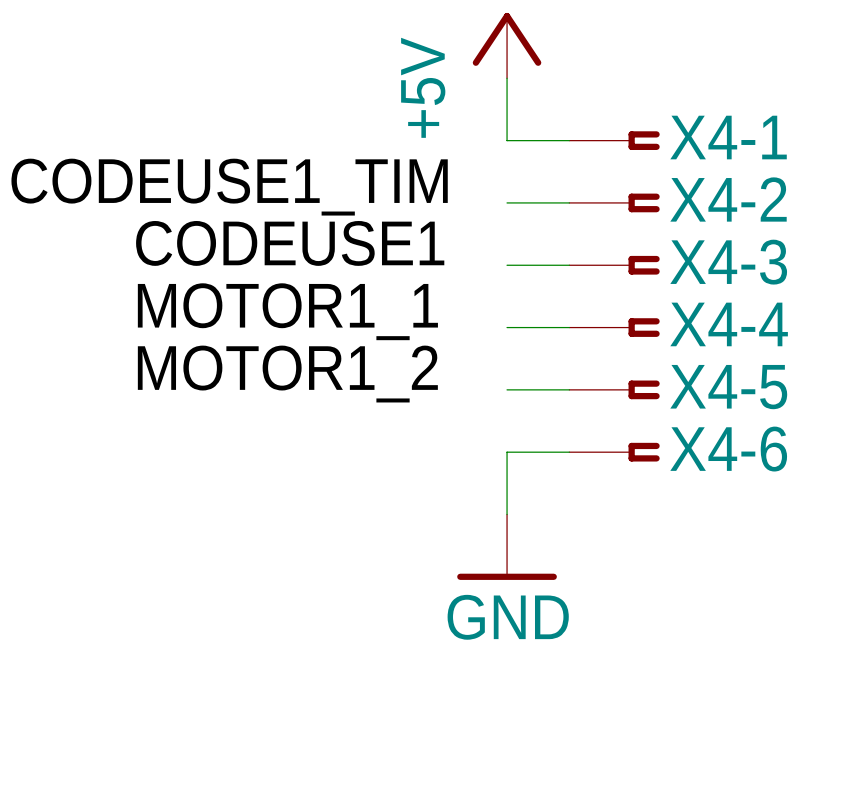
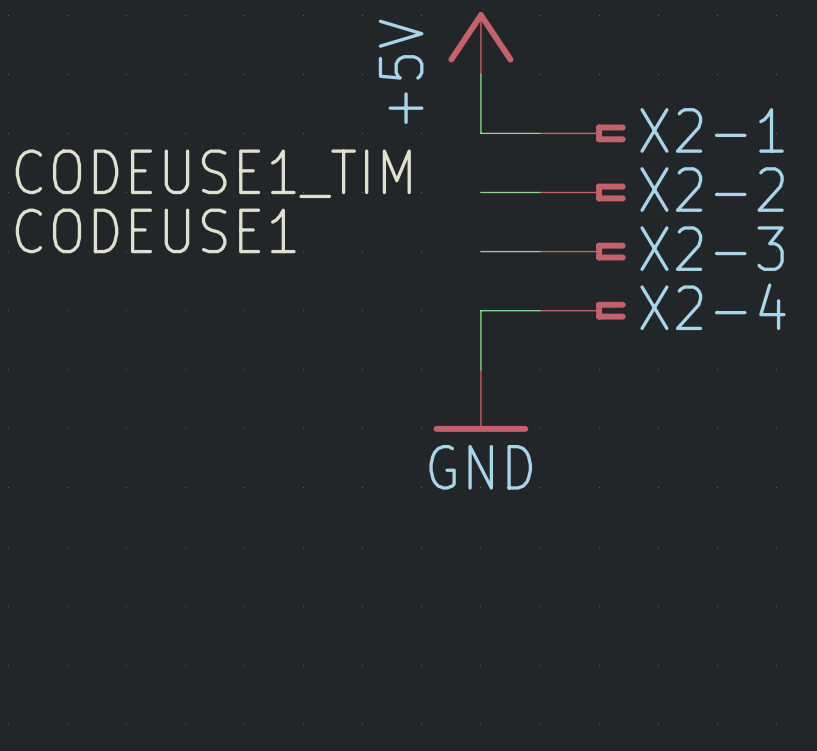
X4-1 name: X4-1 (728, 137) -> X2-1 (712, 130)
X4-2 name: X4-2 (728, 199) -> X2-2 (712, 189)
label position: CODEUSE1 (290, 243) -> CODEUSE1 (155, 230)
X4-3 name: X4-3 (728, 262) -> X2-3 (712, 248)
label: MOTOR1_1 (287, 311) -> none
X4-4 name: X4-4 (729, 324) -> X2-4 (712, 306)
label: MOTOR1_2 (287, 374) -> none
wire: (507, 389) (569, 389) -> (480, 369) (480, 310)
X4-5: (614, 389) -> none
wire: (569, 452) (507, 452) (507, 514) -> none
X4-6: (614, 452) -> none
power symbol position: GND (507, 547) -> GND (480, 400)

